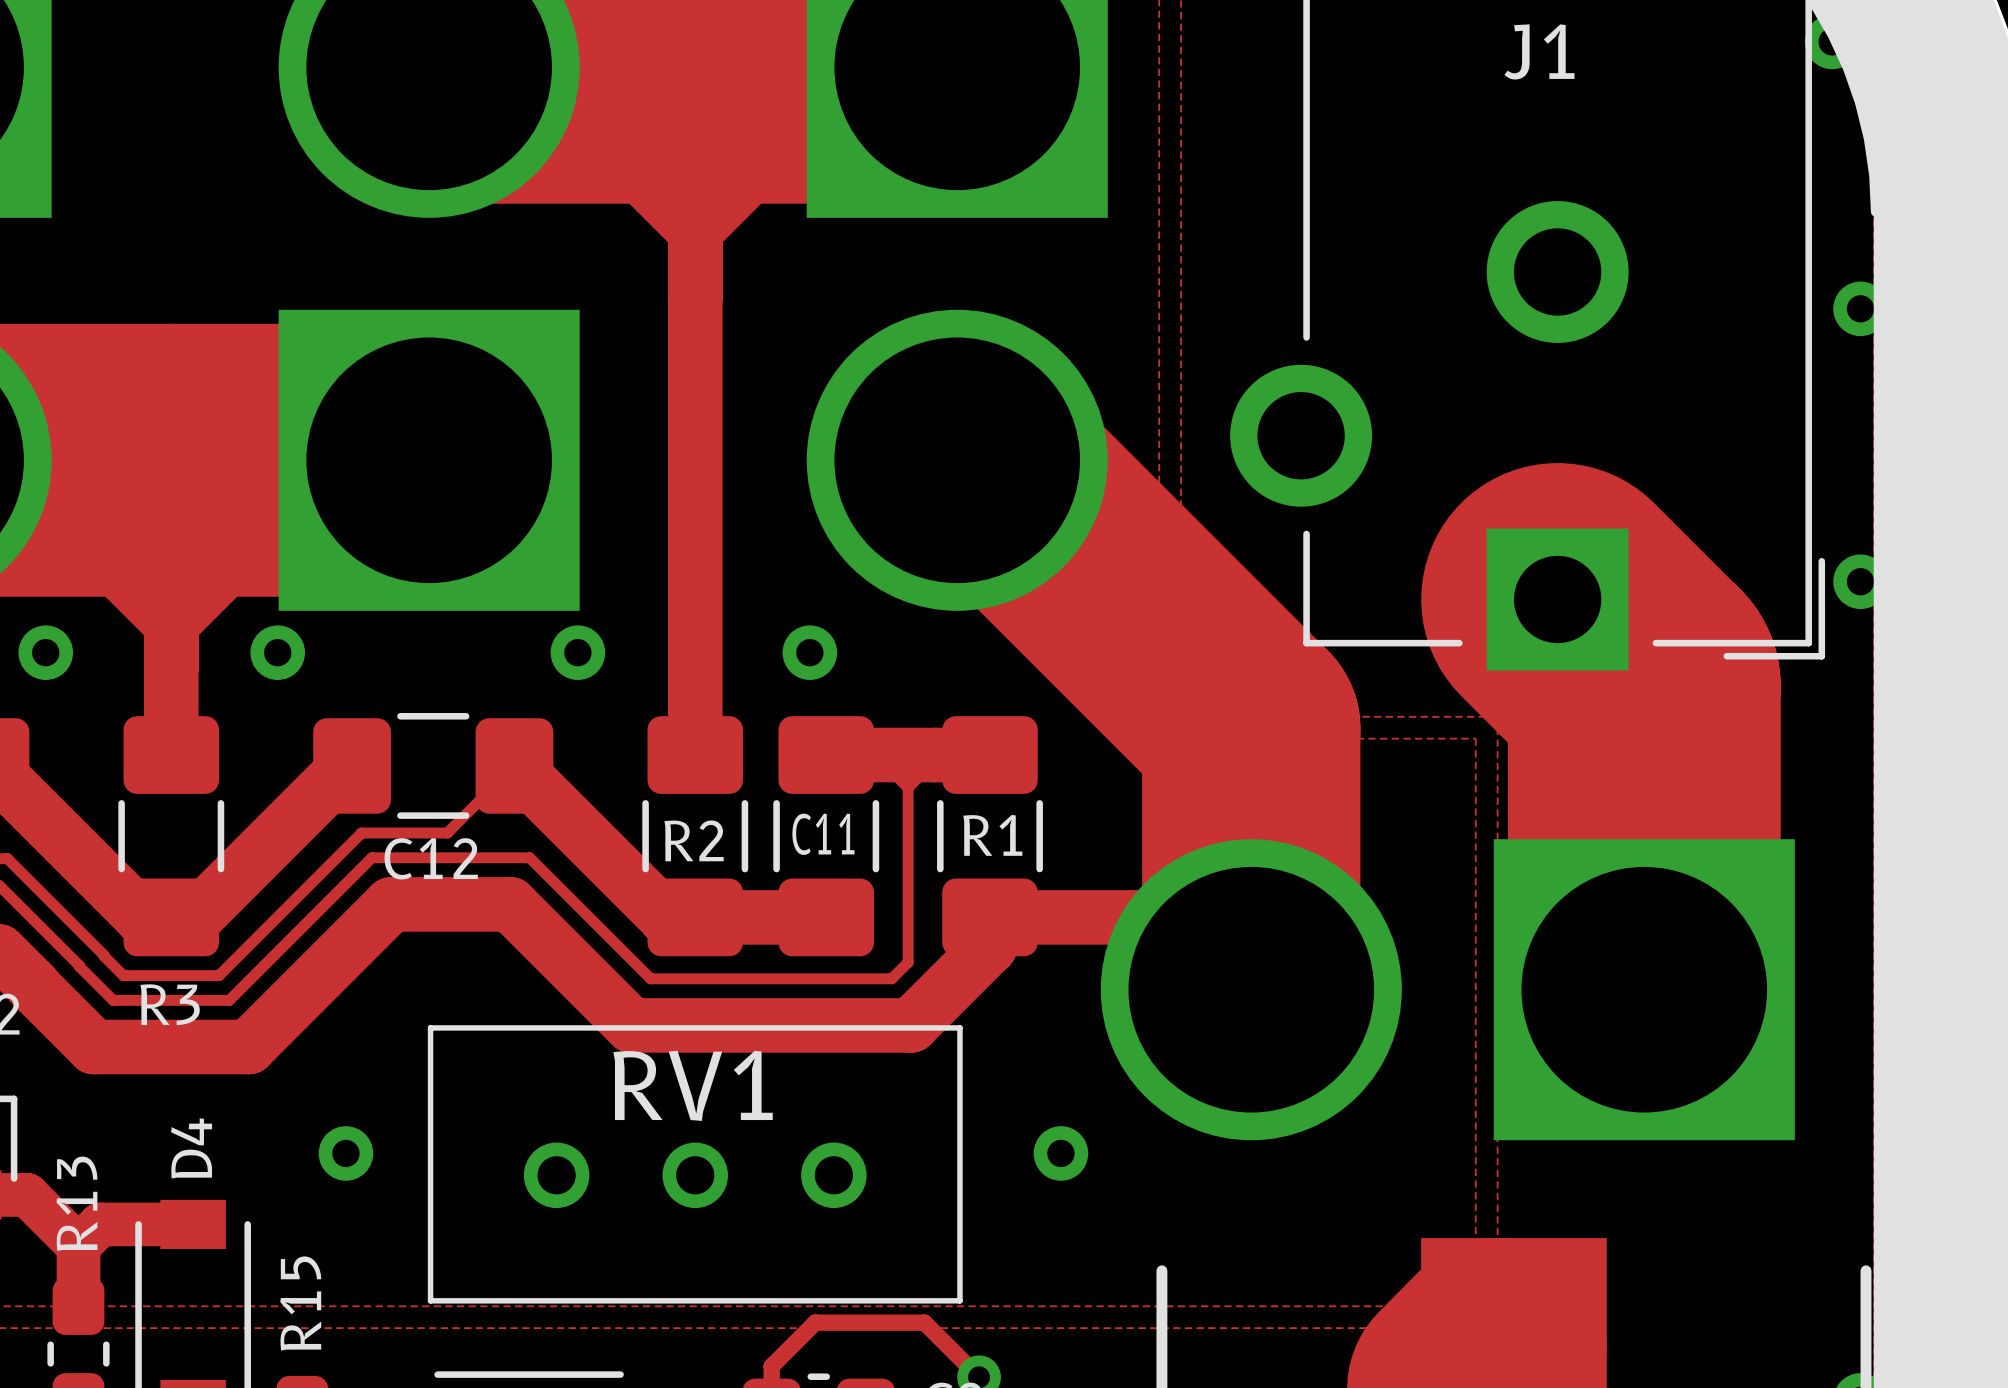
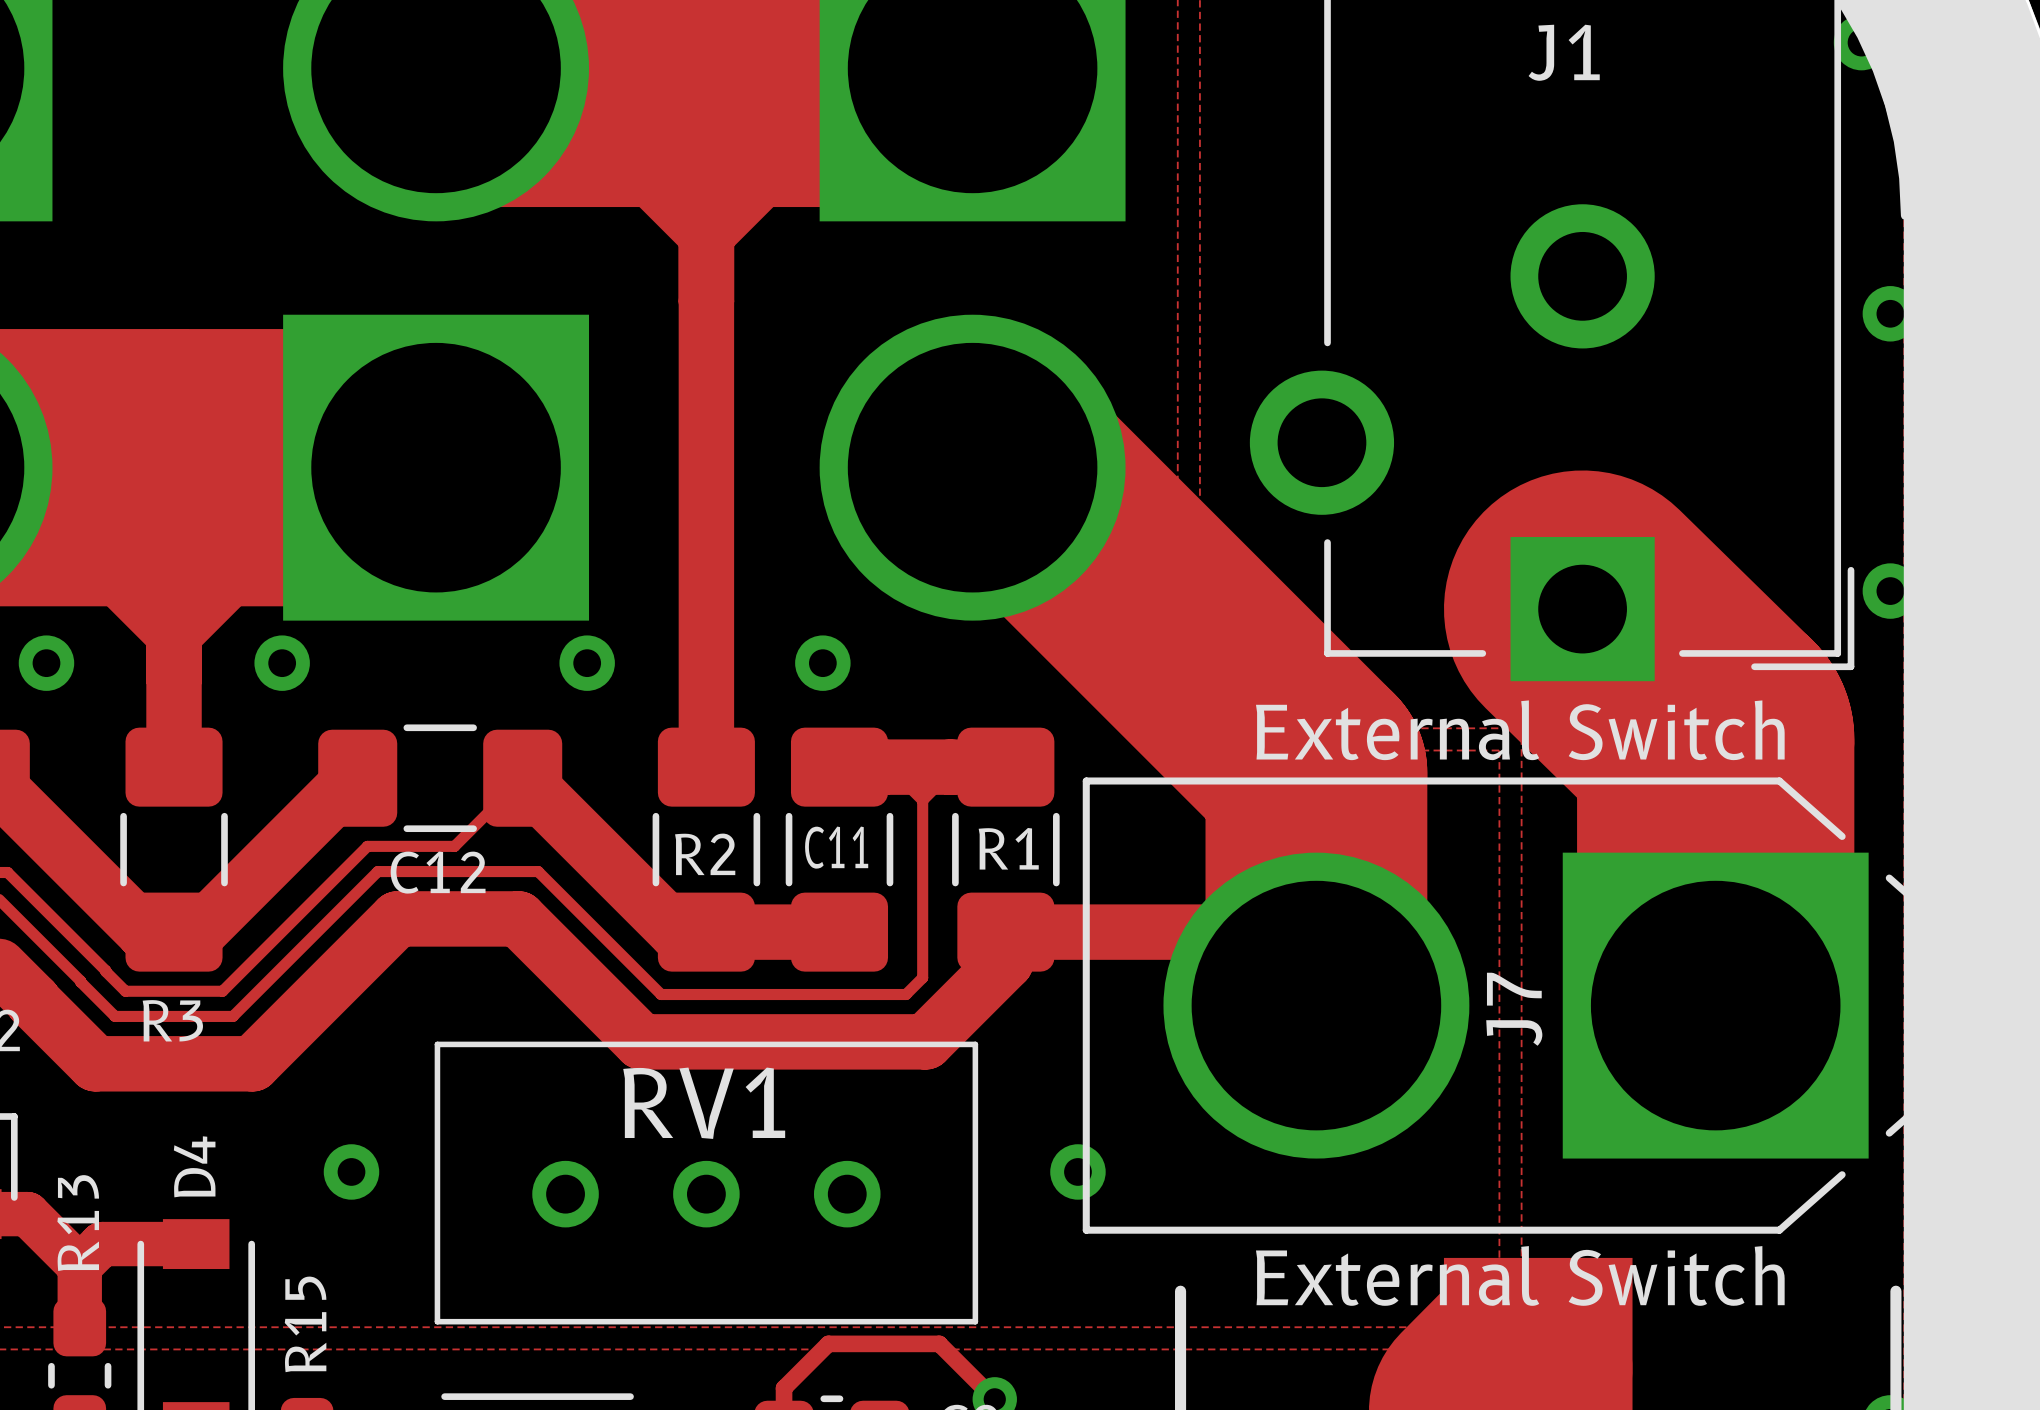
track: (983, 460) (1251, 728) (1251, 989) -> none
track: none -> (1011, 467) (1316, 772) (1316, 1005)
track: (1557, 599) (1644, 686) (1644, 989) -> (1582, 609) (1715, 739) (1715, 1005)
text: none -> External Switch (1520, 730)
J7 side: bottom (1447, 989) -> top (1540, 1005)
text: none -> External Switch (1520, 1275)

